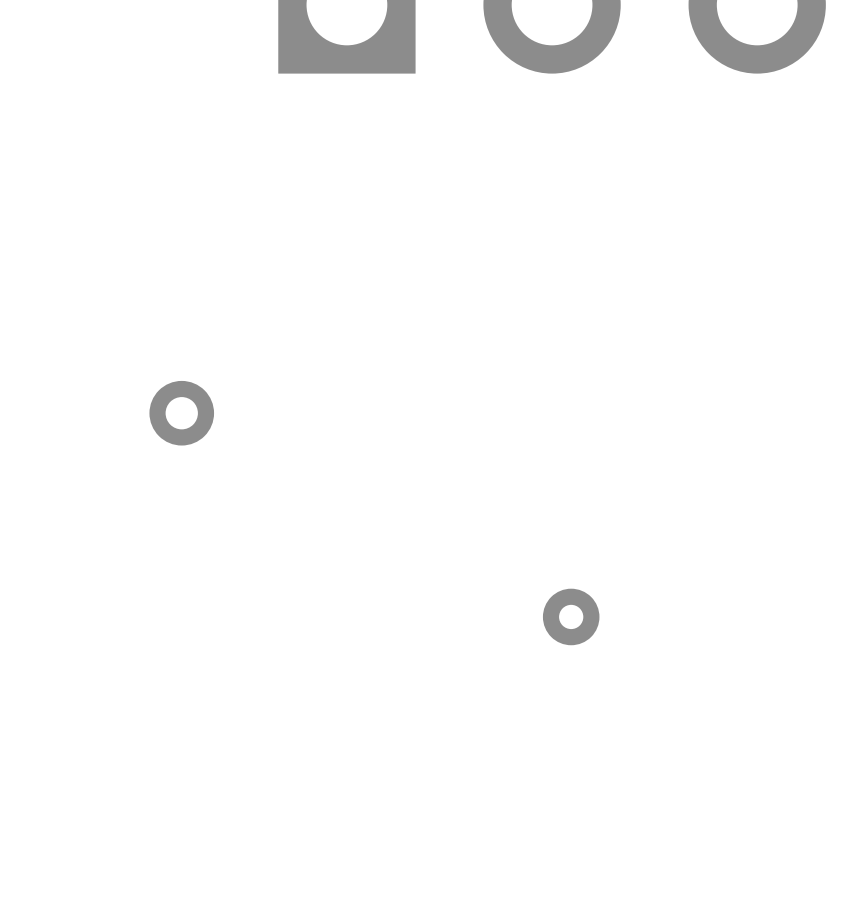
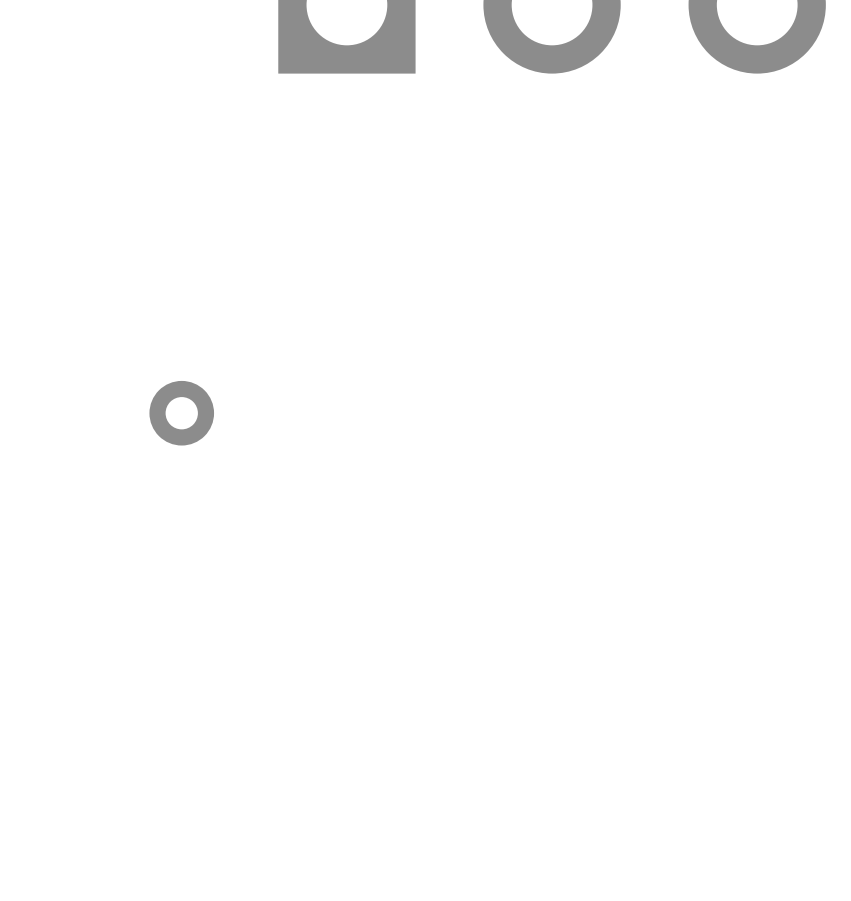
via: (571, 616) -> none

